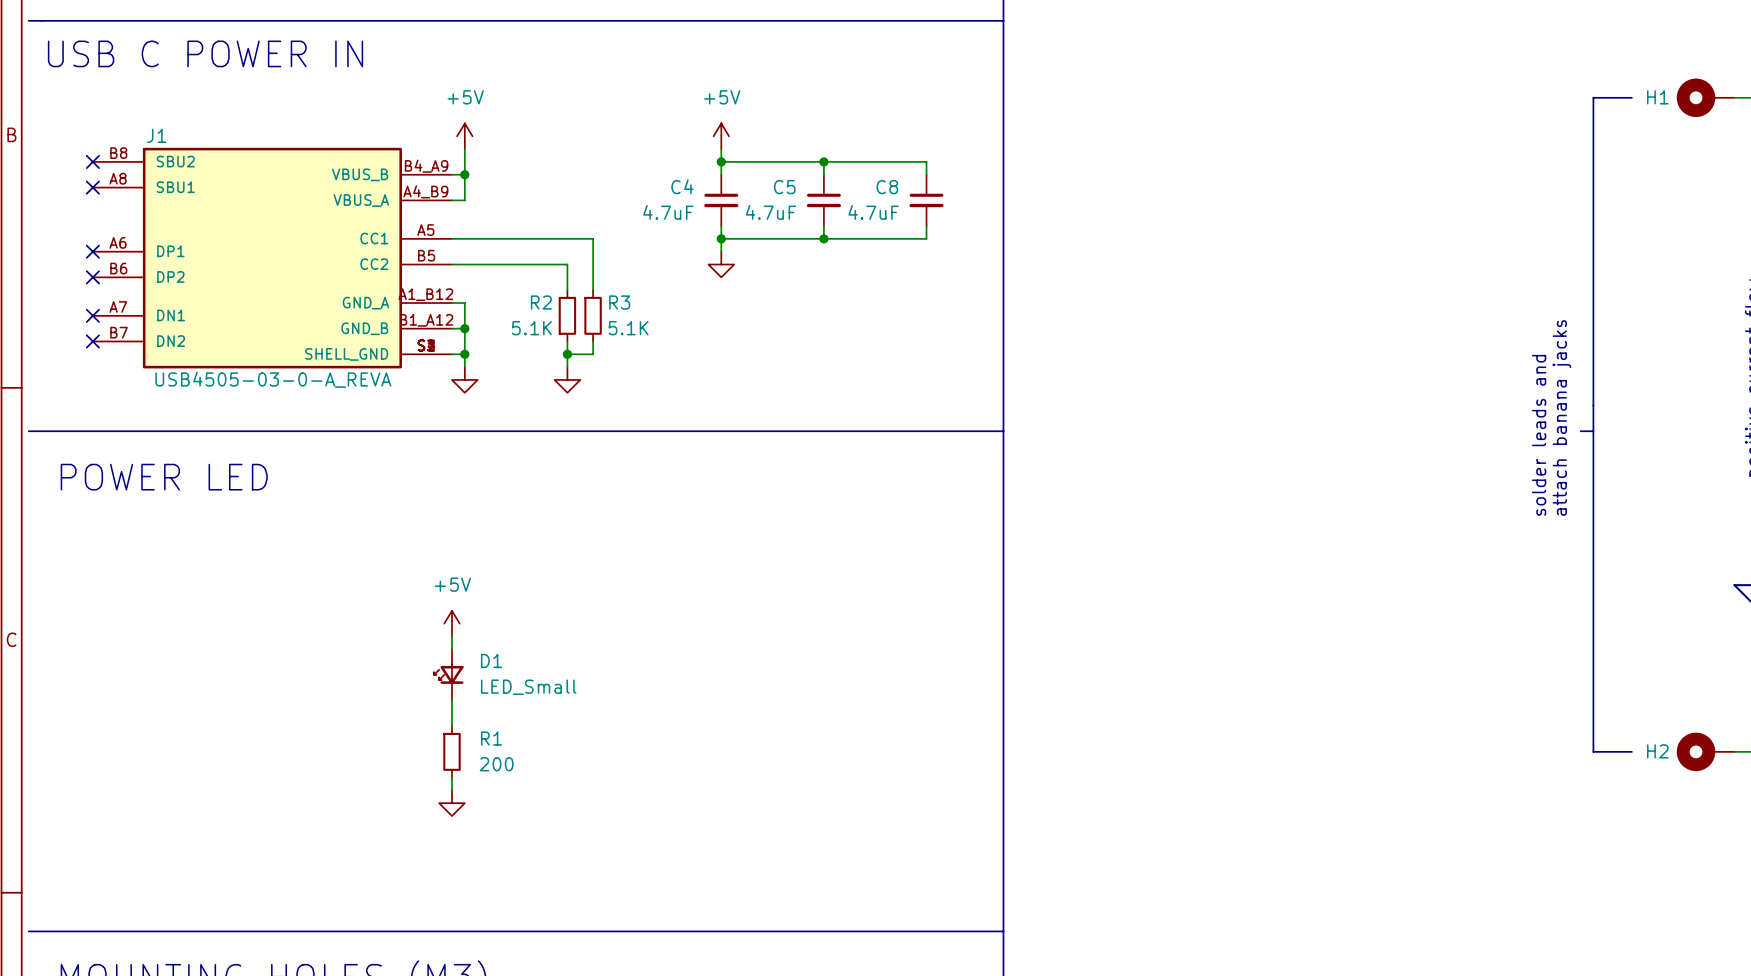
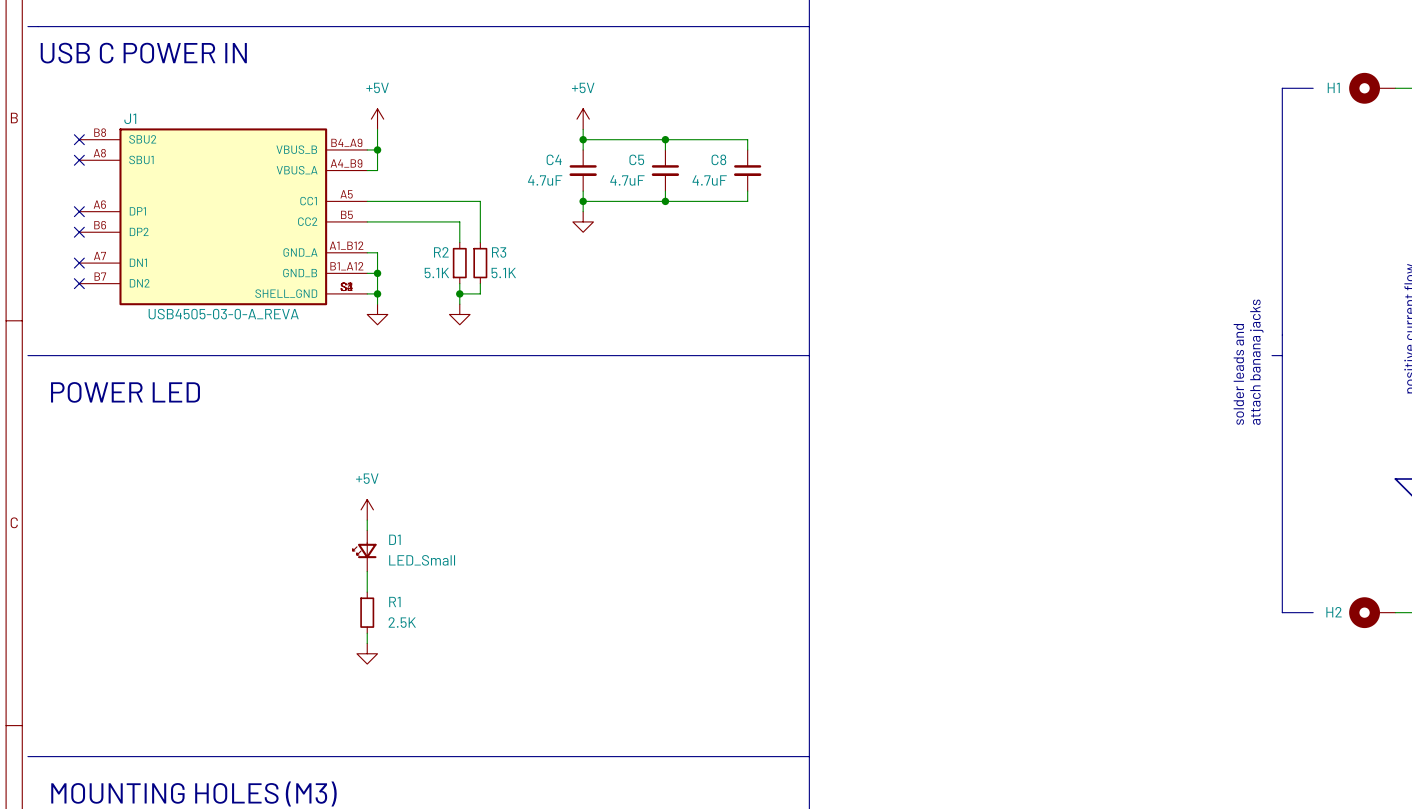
R1 value: 200 (496, 764) -> 2.5K (402, 622)

